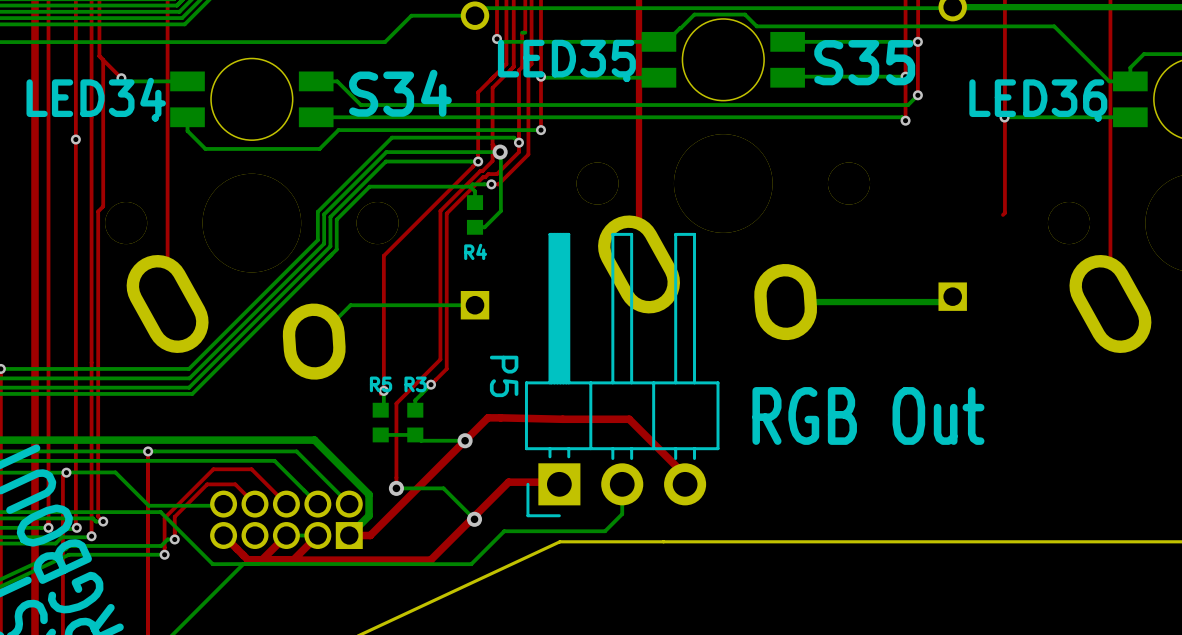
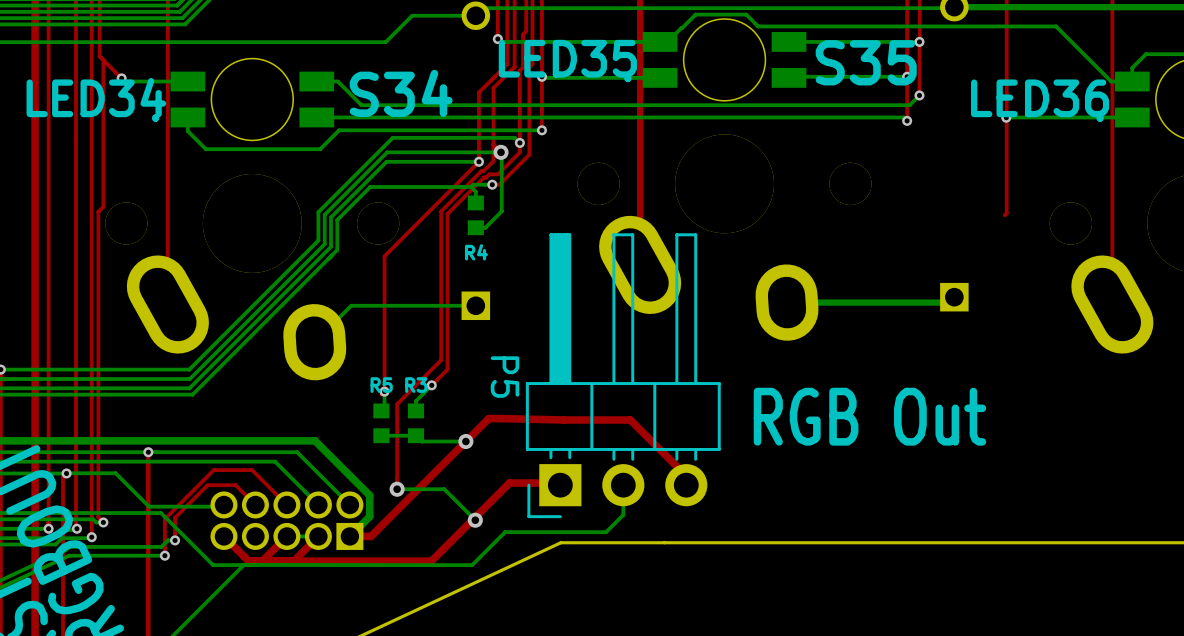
bottom track: (525, 32) (522, 32) -> none
via: (75, 139) -> none

